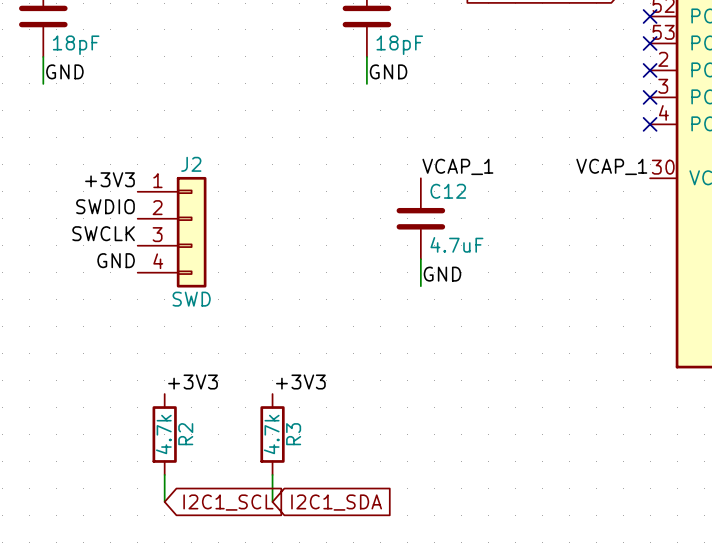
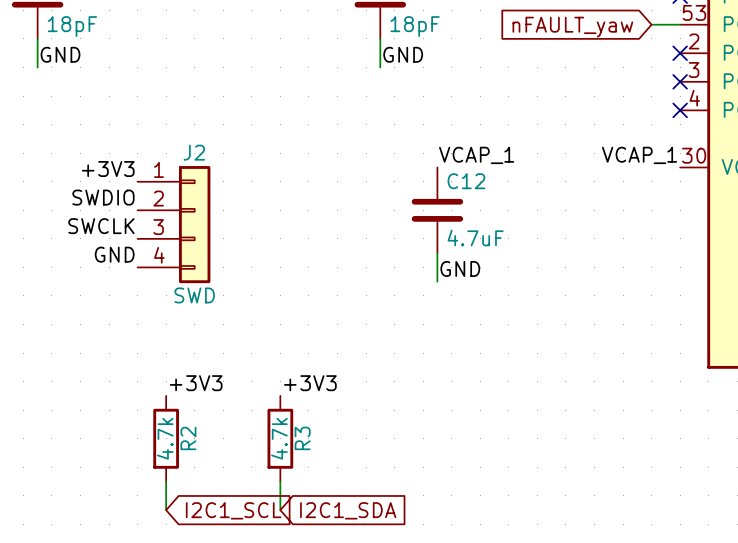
wire: none -> (651, 24) (680, 24)
no-connect mark: (650, 43) -> none
global label: none -> nFAULT_yaw (572, 27)

